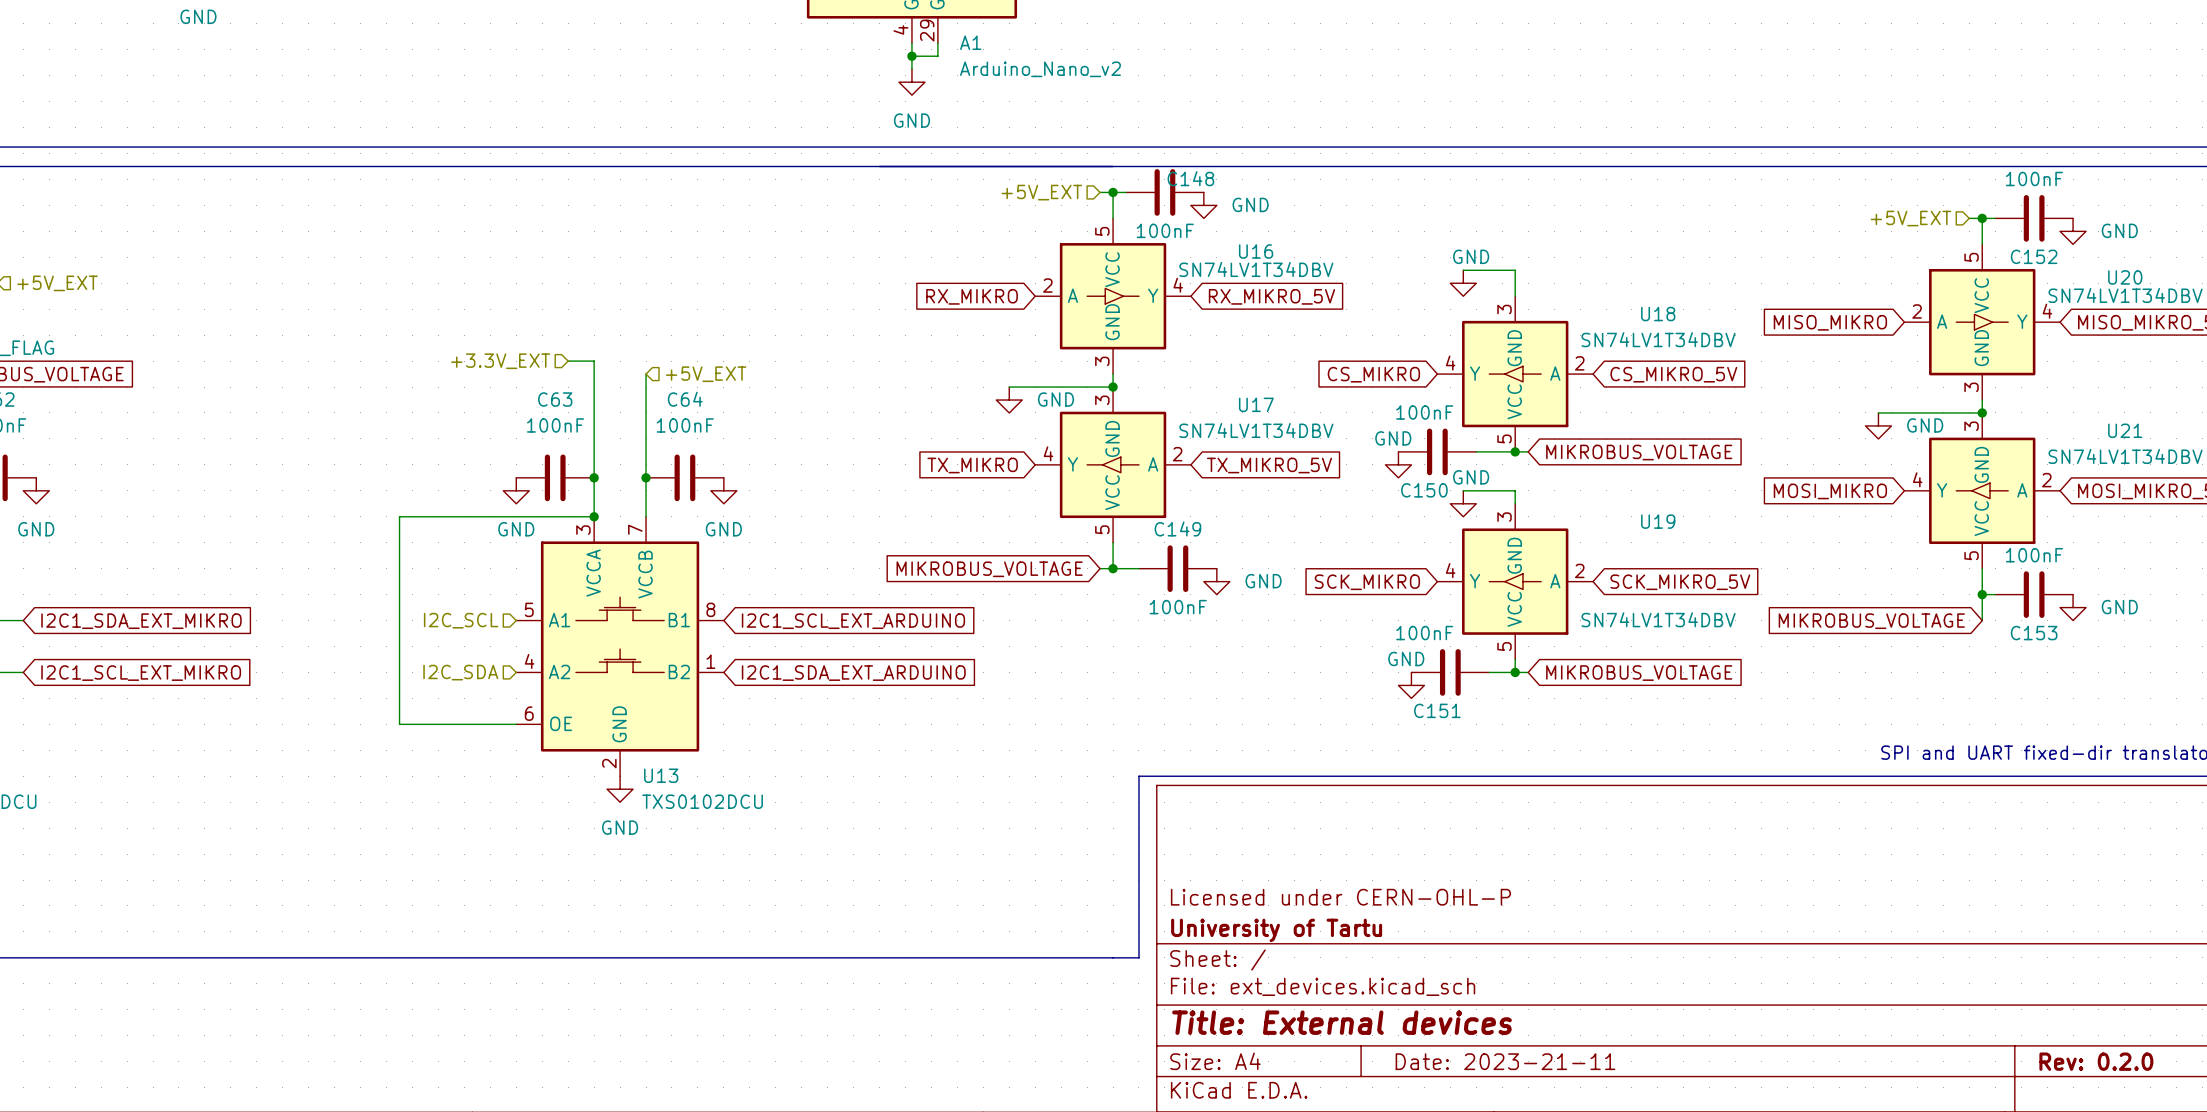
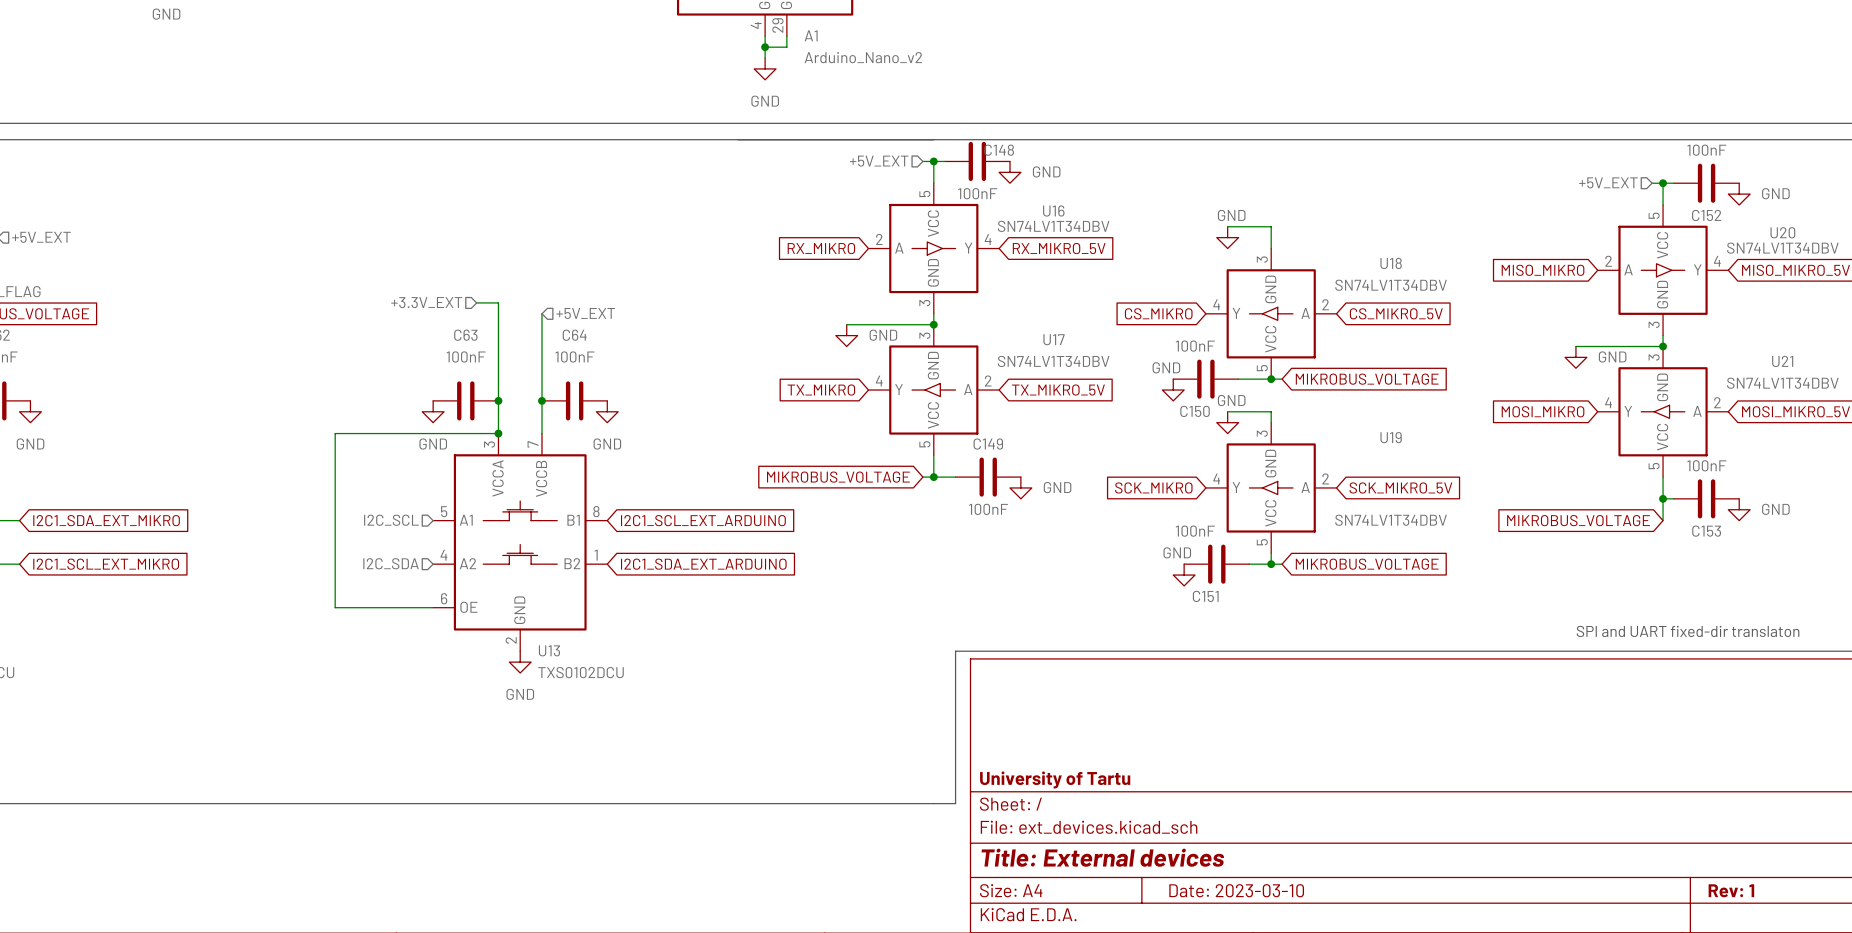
title block: Licensed under CERN-OHL-P (1340, 897) -> none
title block: Date: 2023-21-11 (1505, 1061) -> Date: 2023-03-10 (1236, 890)
title block: Rev: 0.2.0 (2096, 1061) -> Rev: 1 (1731, 890)

